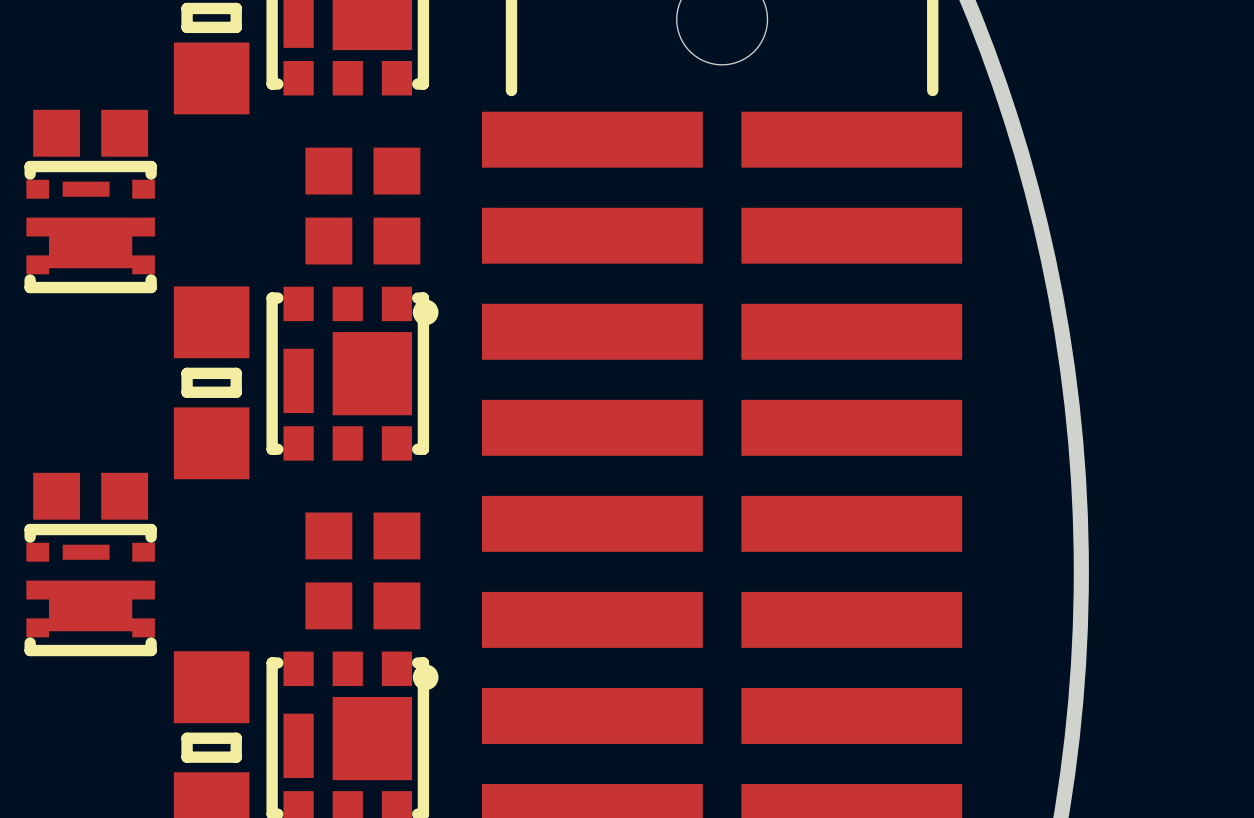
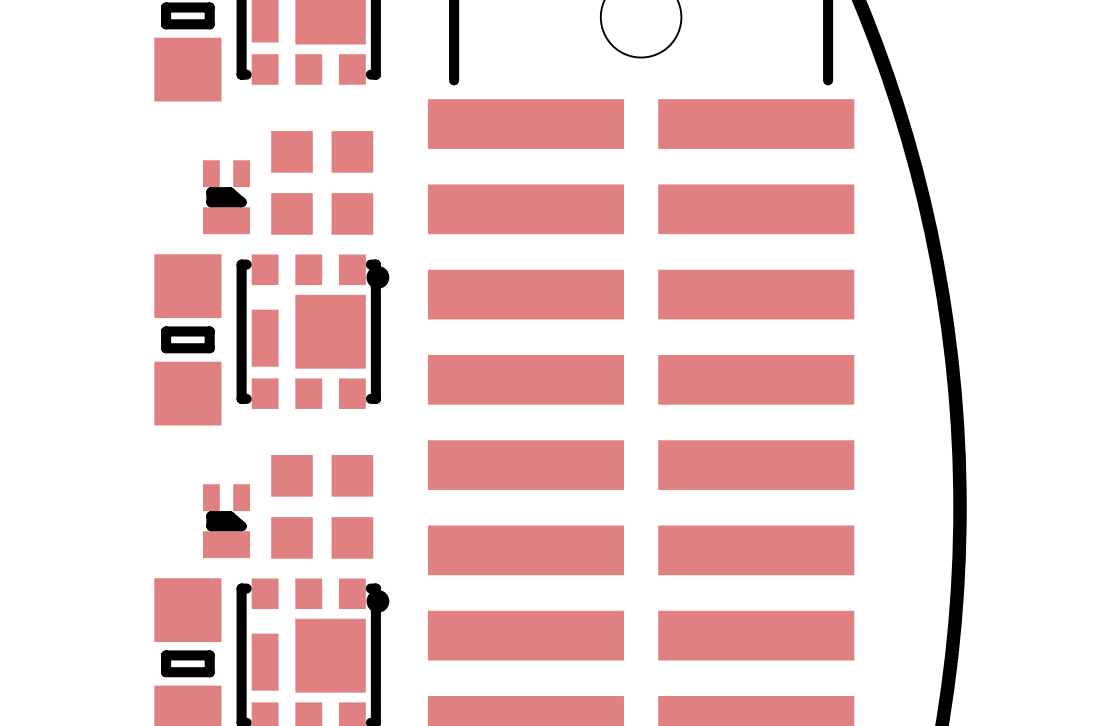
part: (90, 133) -> none
part: none -> (226, 197)
part: (90, 227) -> none
part: (90, 496) -> none
part: none -> (226, 521)
part: (90, 590) -> none

